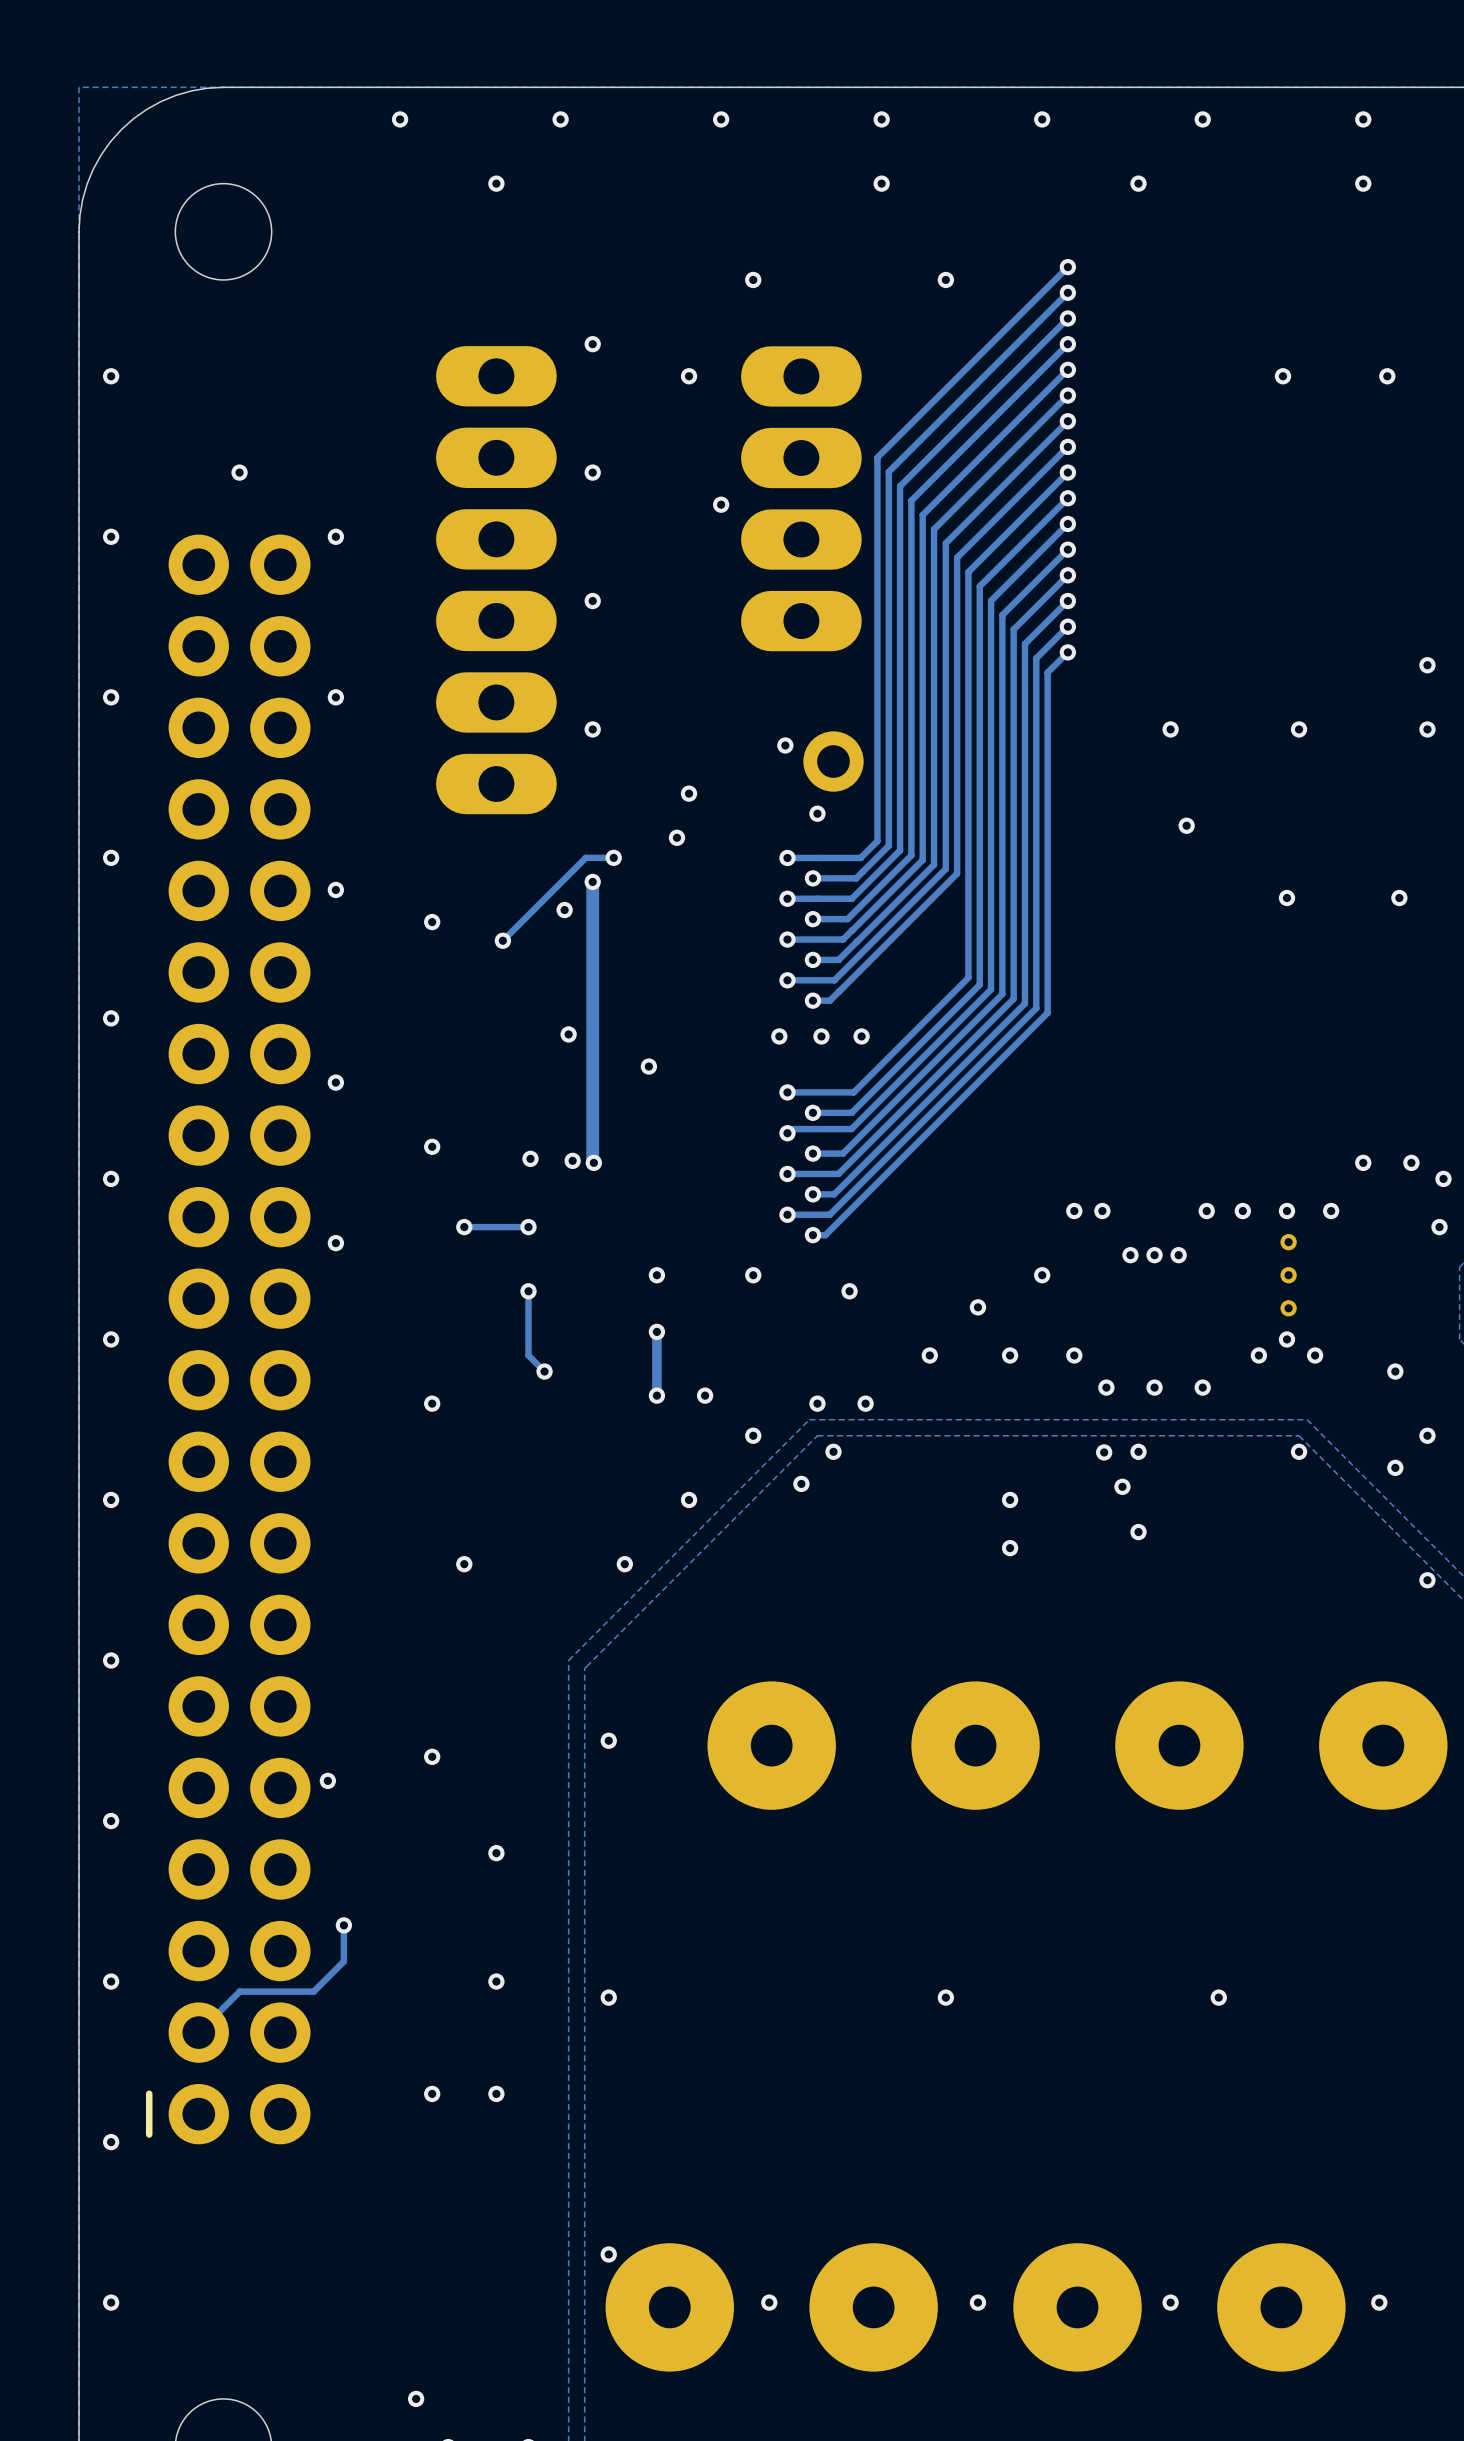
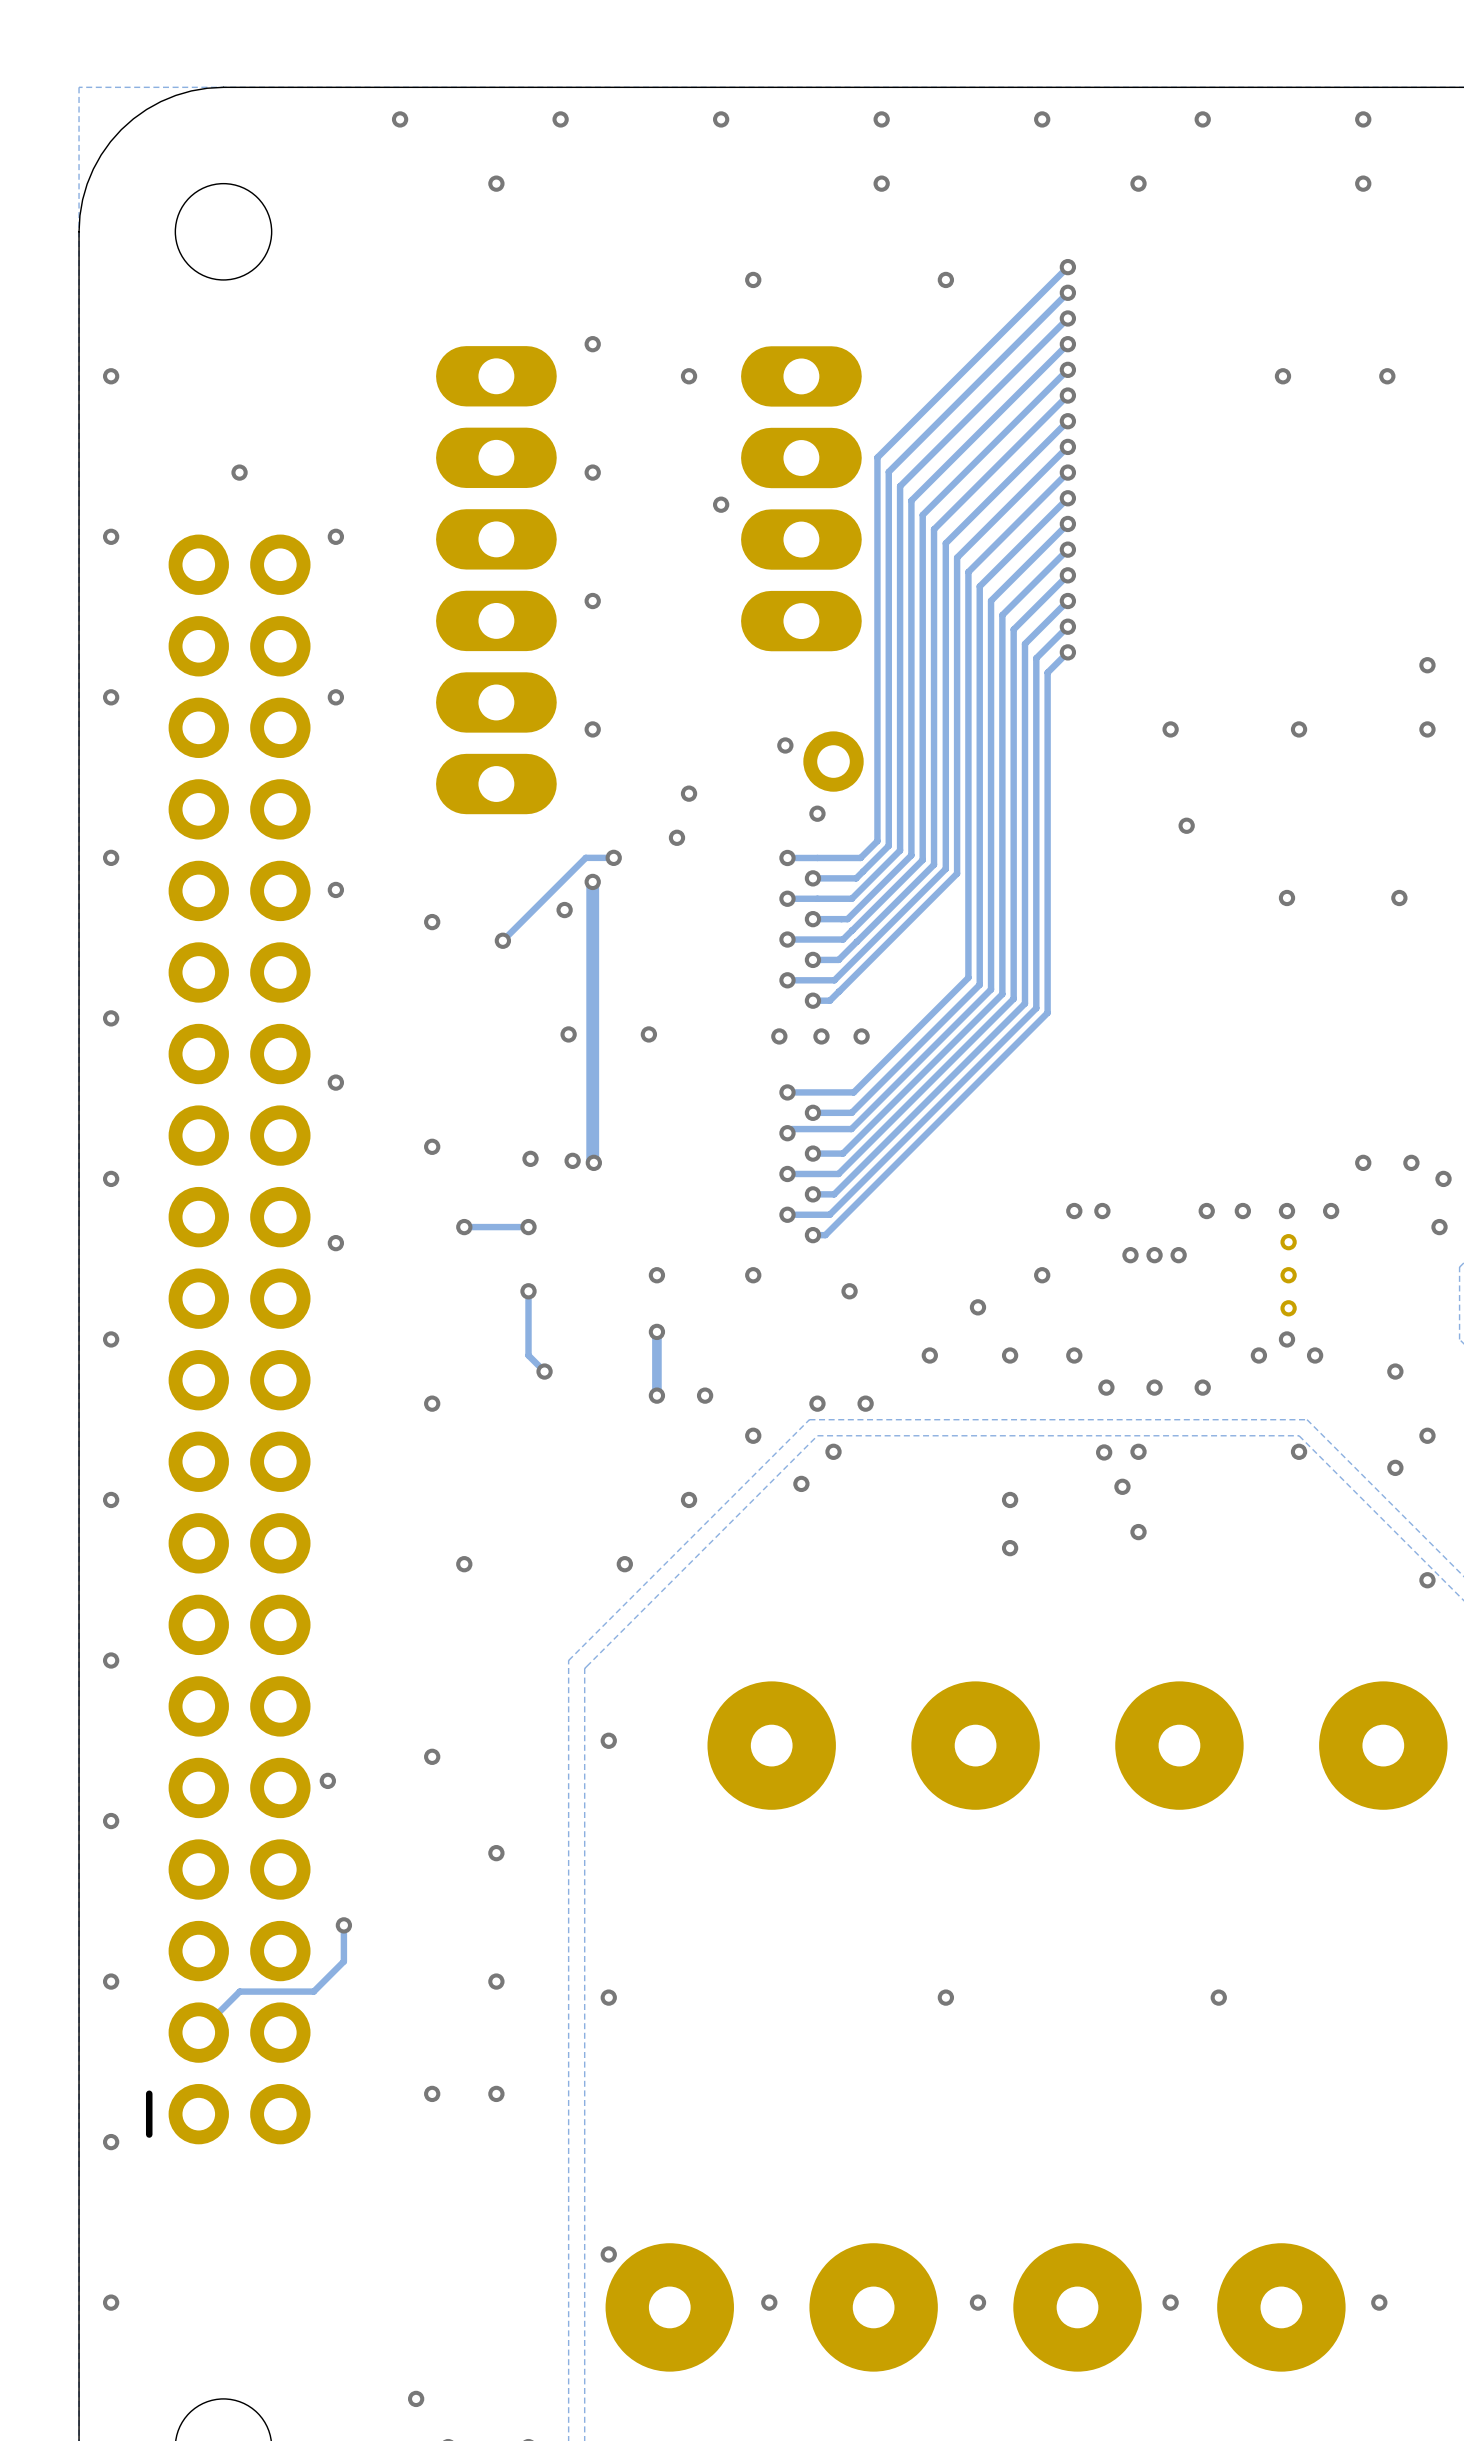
via position: (648, 1066) -> (648, 1034)

